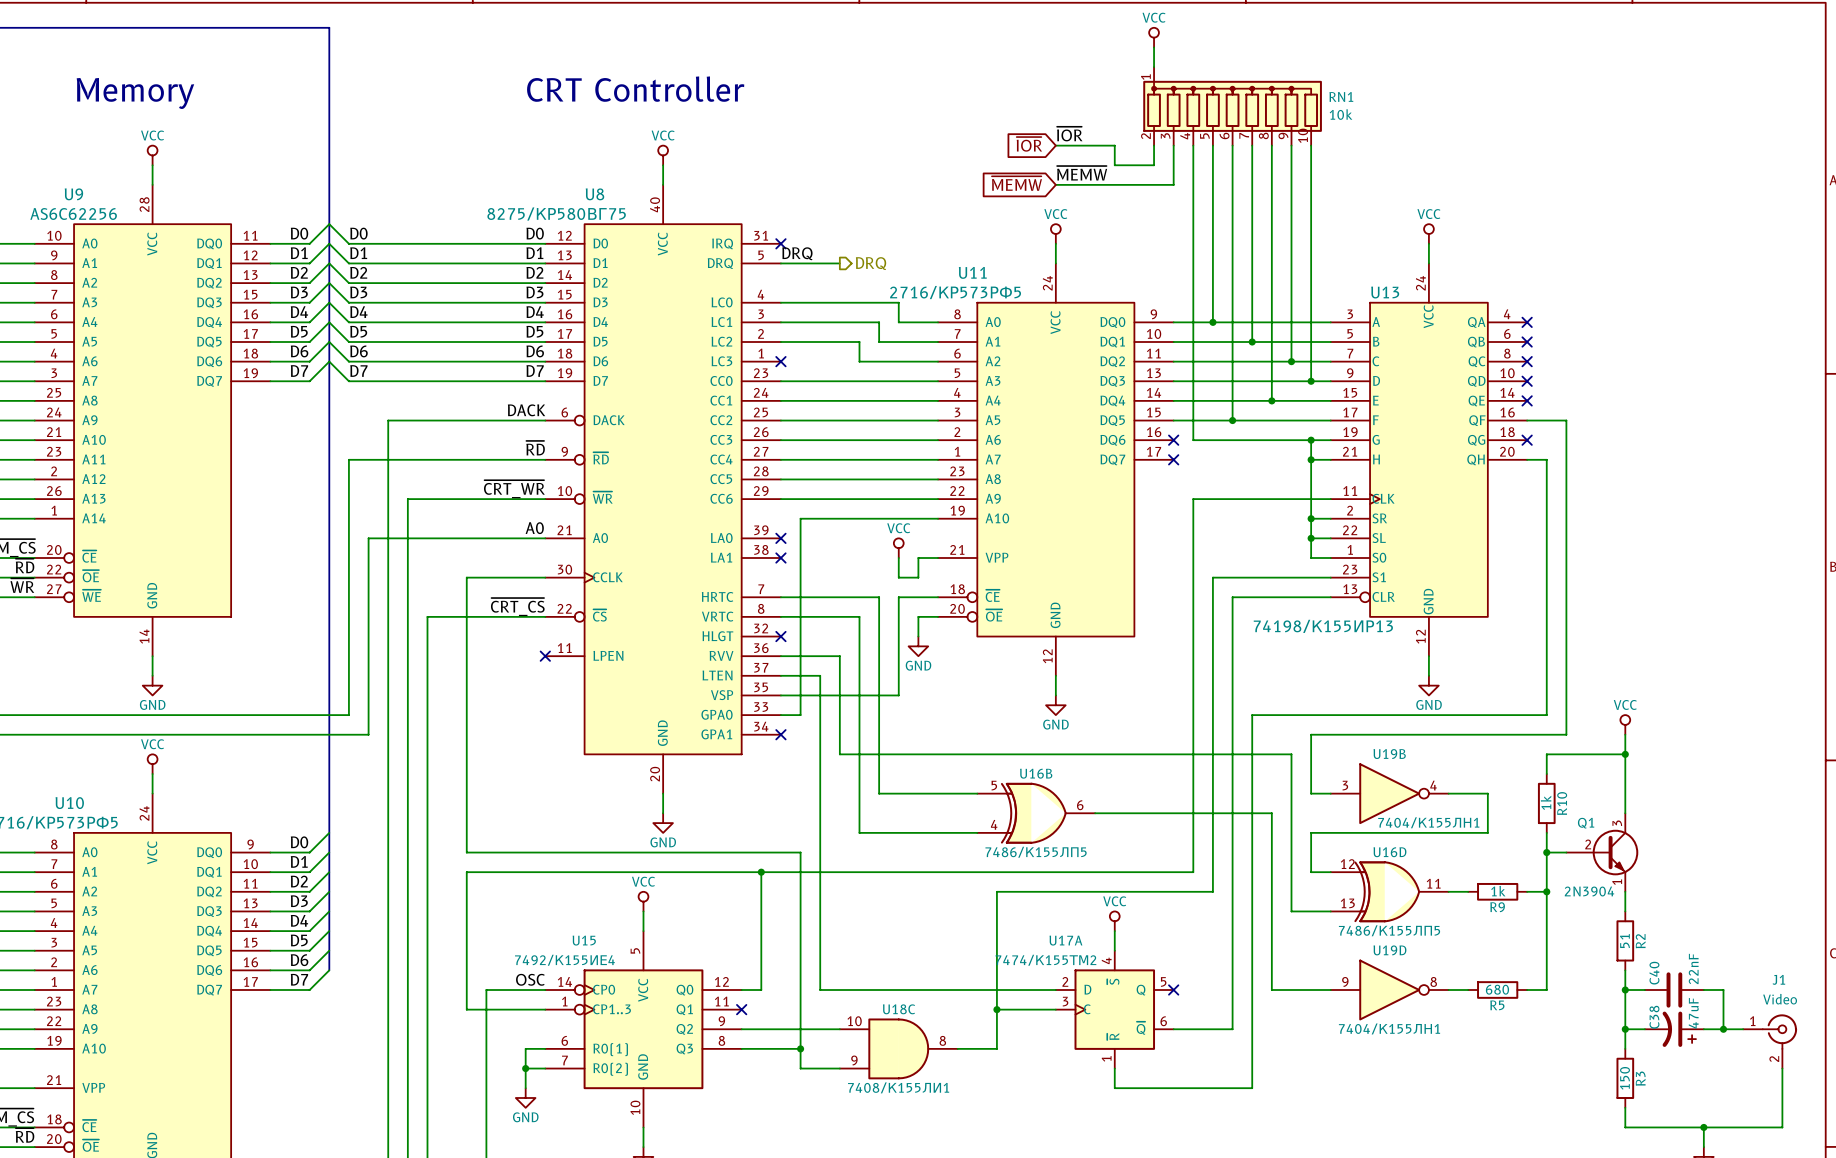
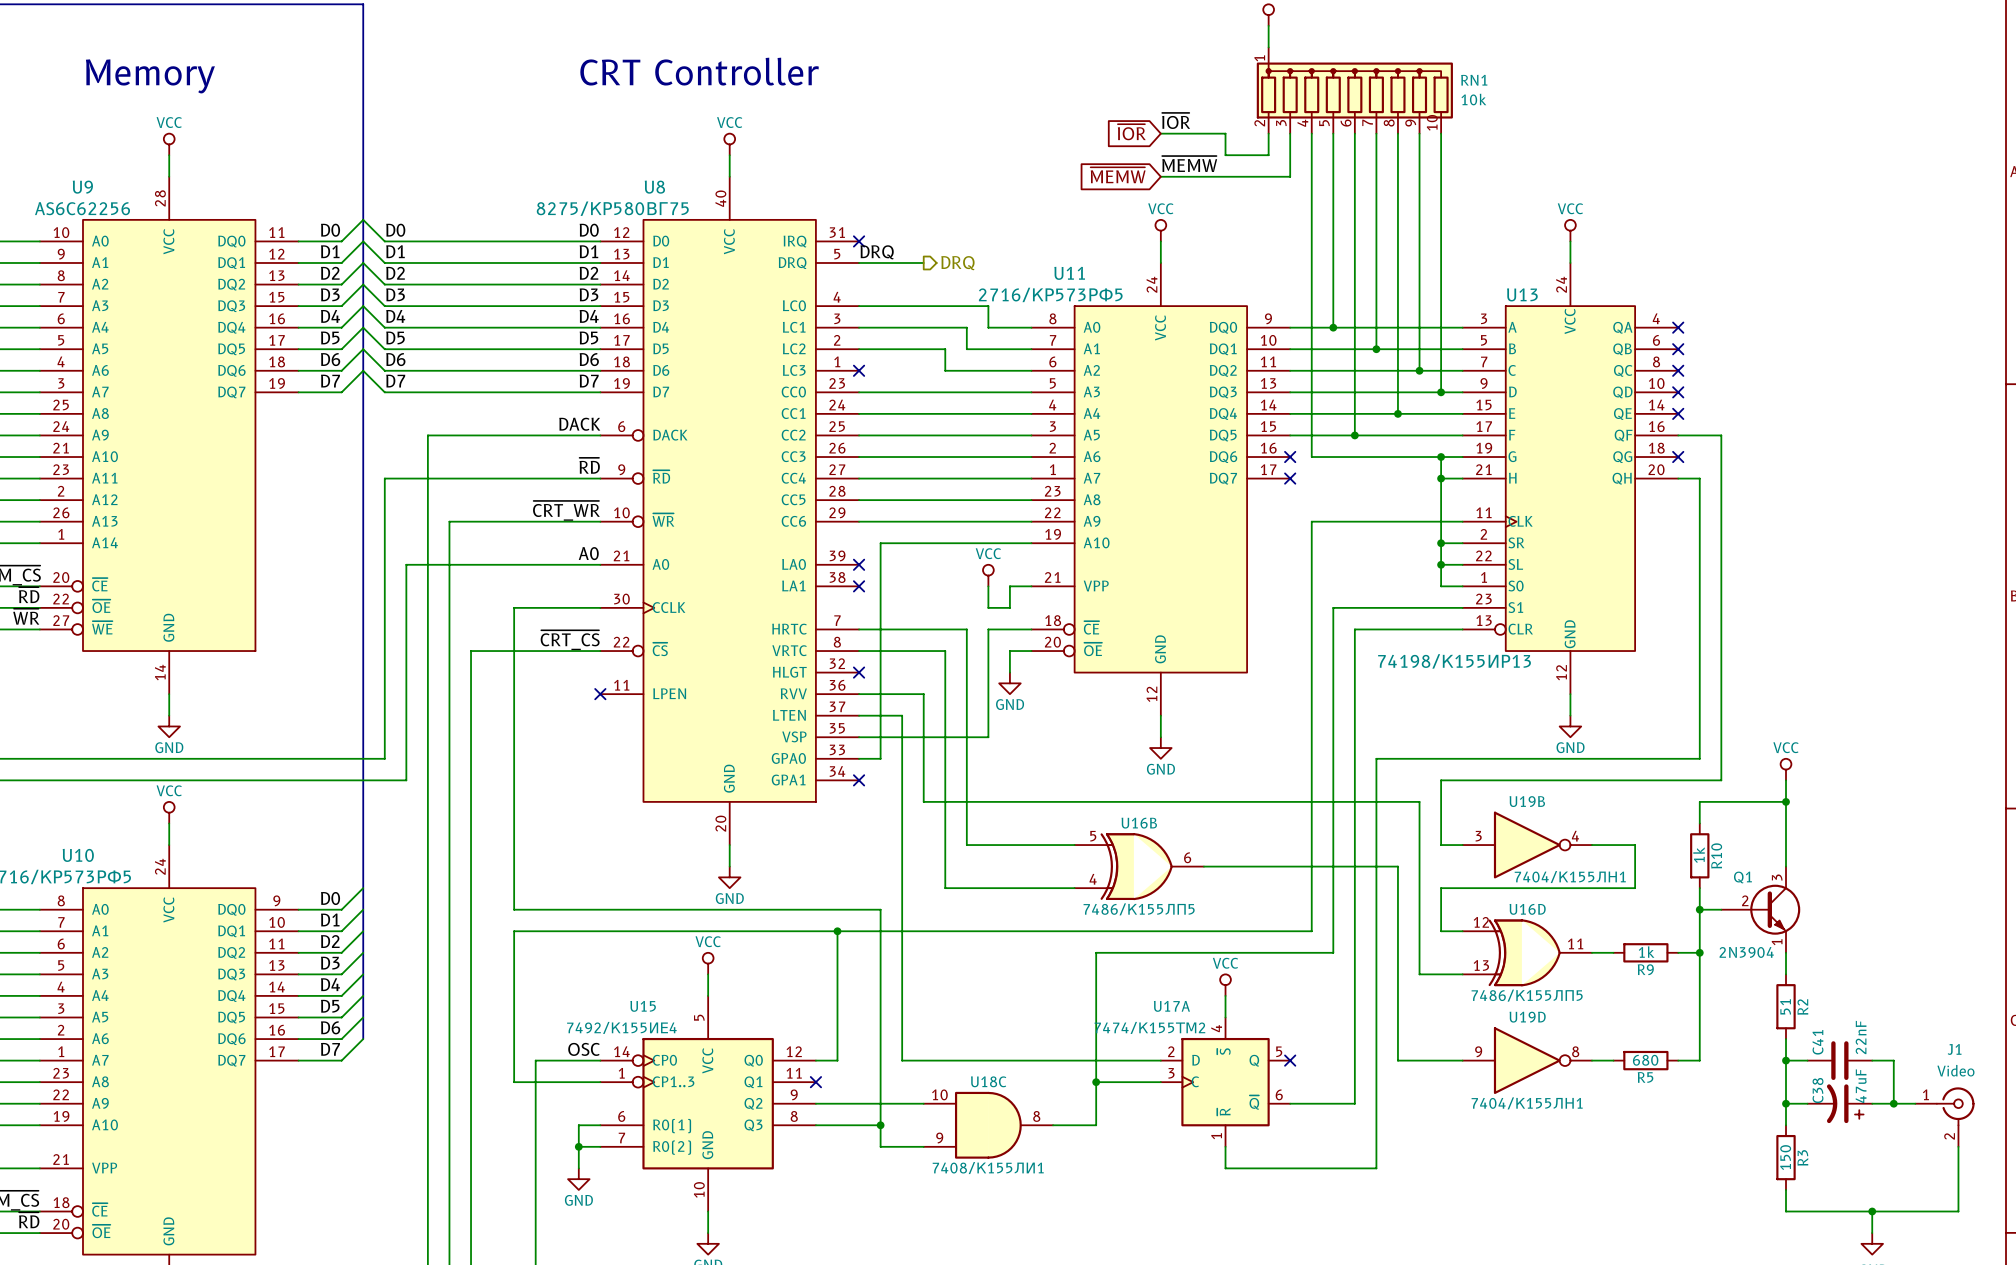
C40 name: C40 (1654, 973) -> C41 (1817, 1042)

